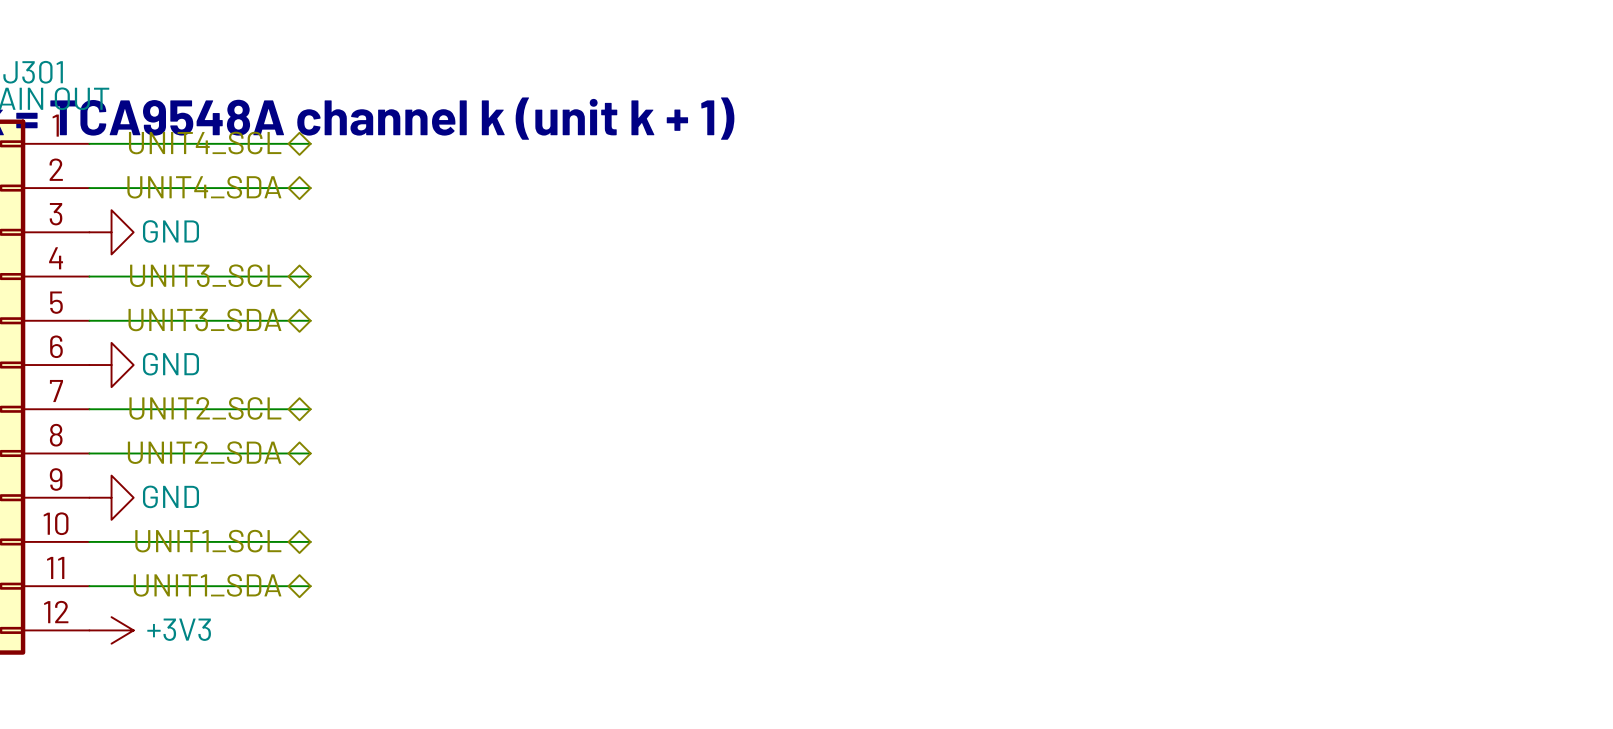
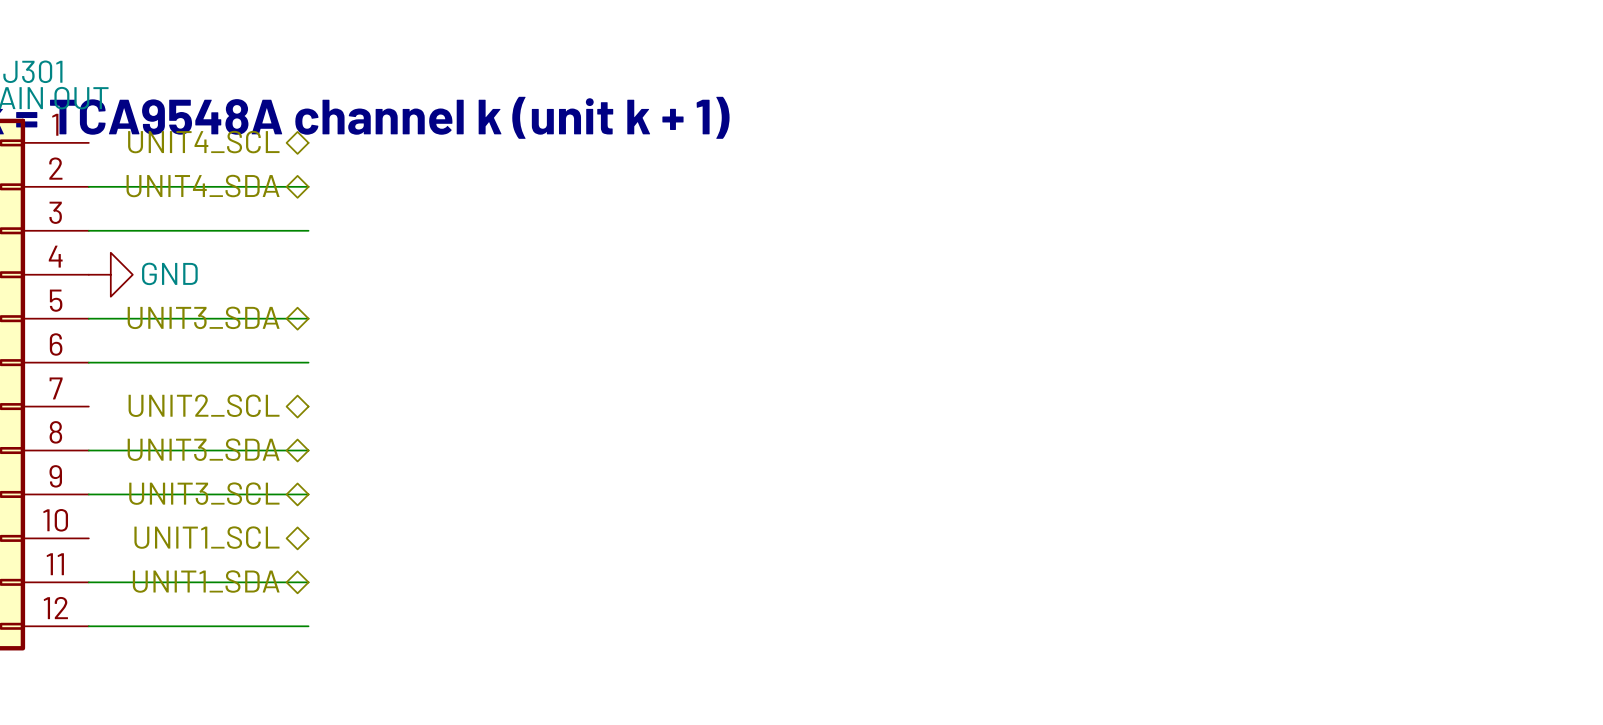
wire: (89, 143) (310, 143) -> (88, 230) (308, 230)
power symbol: GND (111, 232) -> none
hierarchical label position: UNIT3_SCL (205, 275) -> UNIT3_SCL (204, 493)
wire: (89, 276) (310, 276) -> (88, 362) (308, 362)
power symbol: none -> GND (110, 274)
power symbol: GND (111, 365) -> none
wire: (89, 409) (310, 409) -> (88, 494) (308, 494)
hierarchical label: UNIT2_SDA (204, 452) -> UNIT3_SDA (203, 449)
power symbol: GND (111, 497) -> none
wire: (89, 541) (310, 541) -> (88, 626) (308, 626)
power symbol: +3V3 (111, 630) -> none

